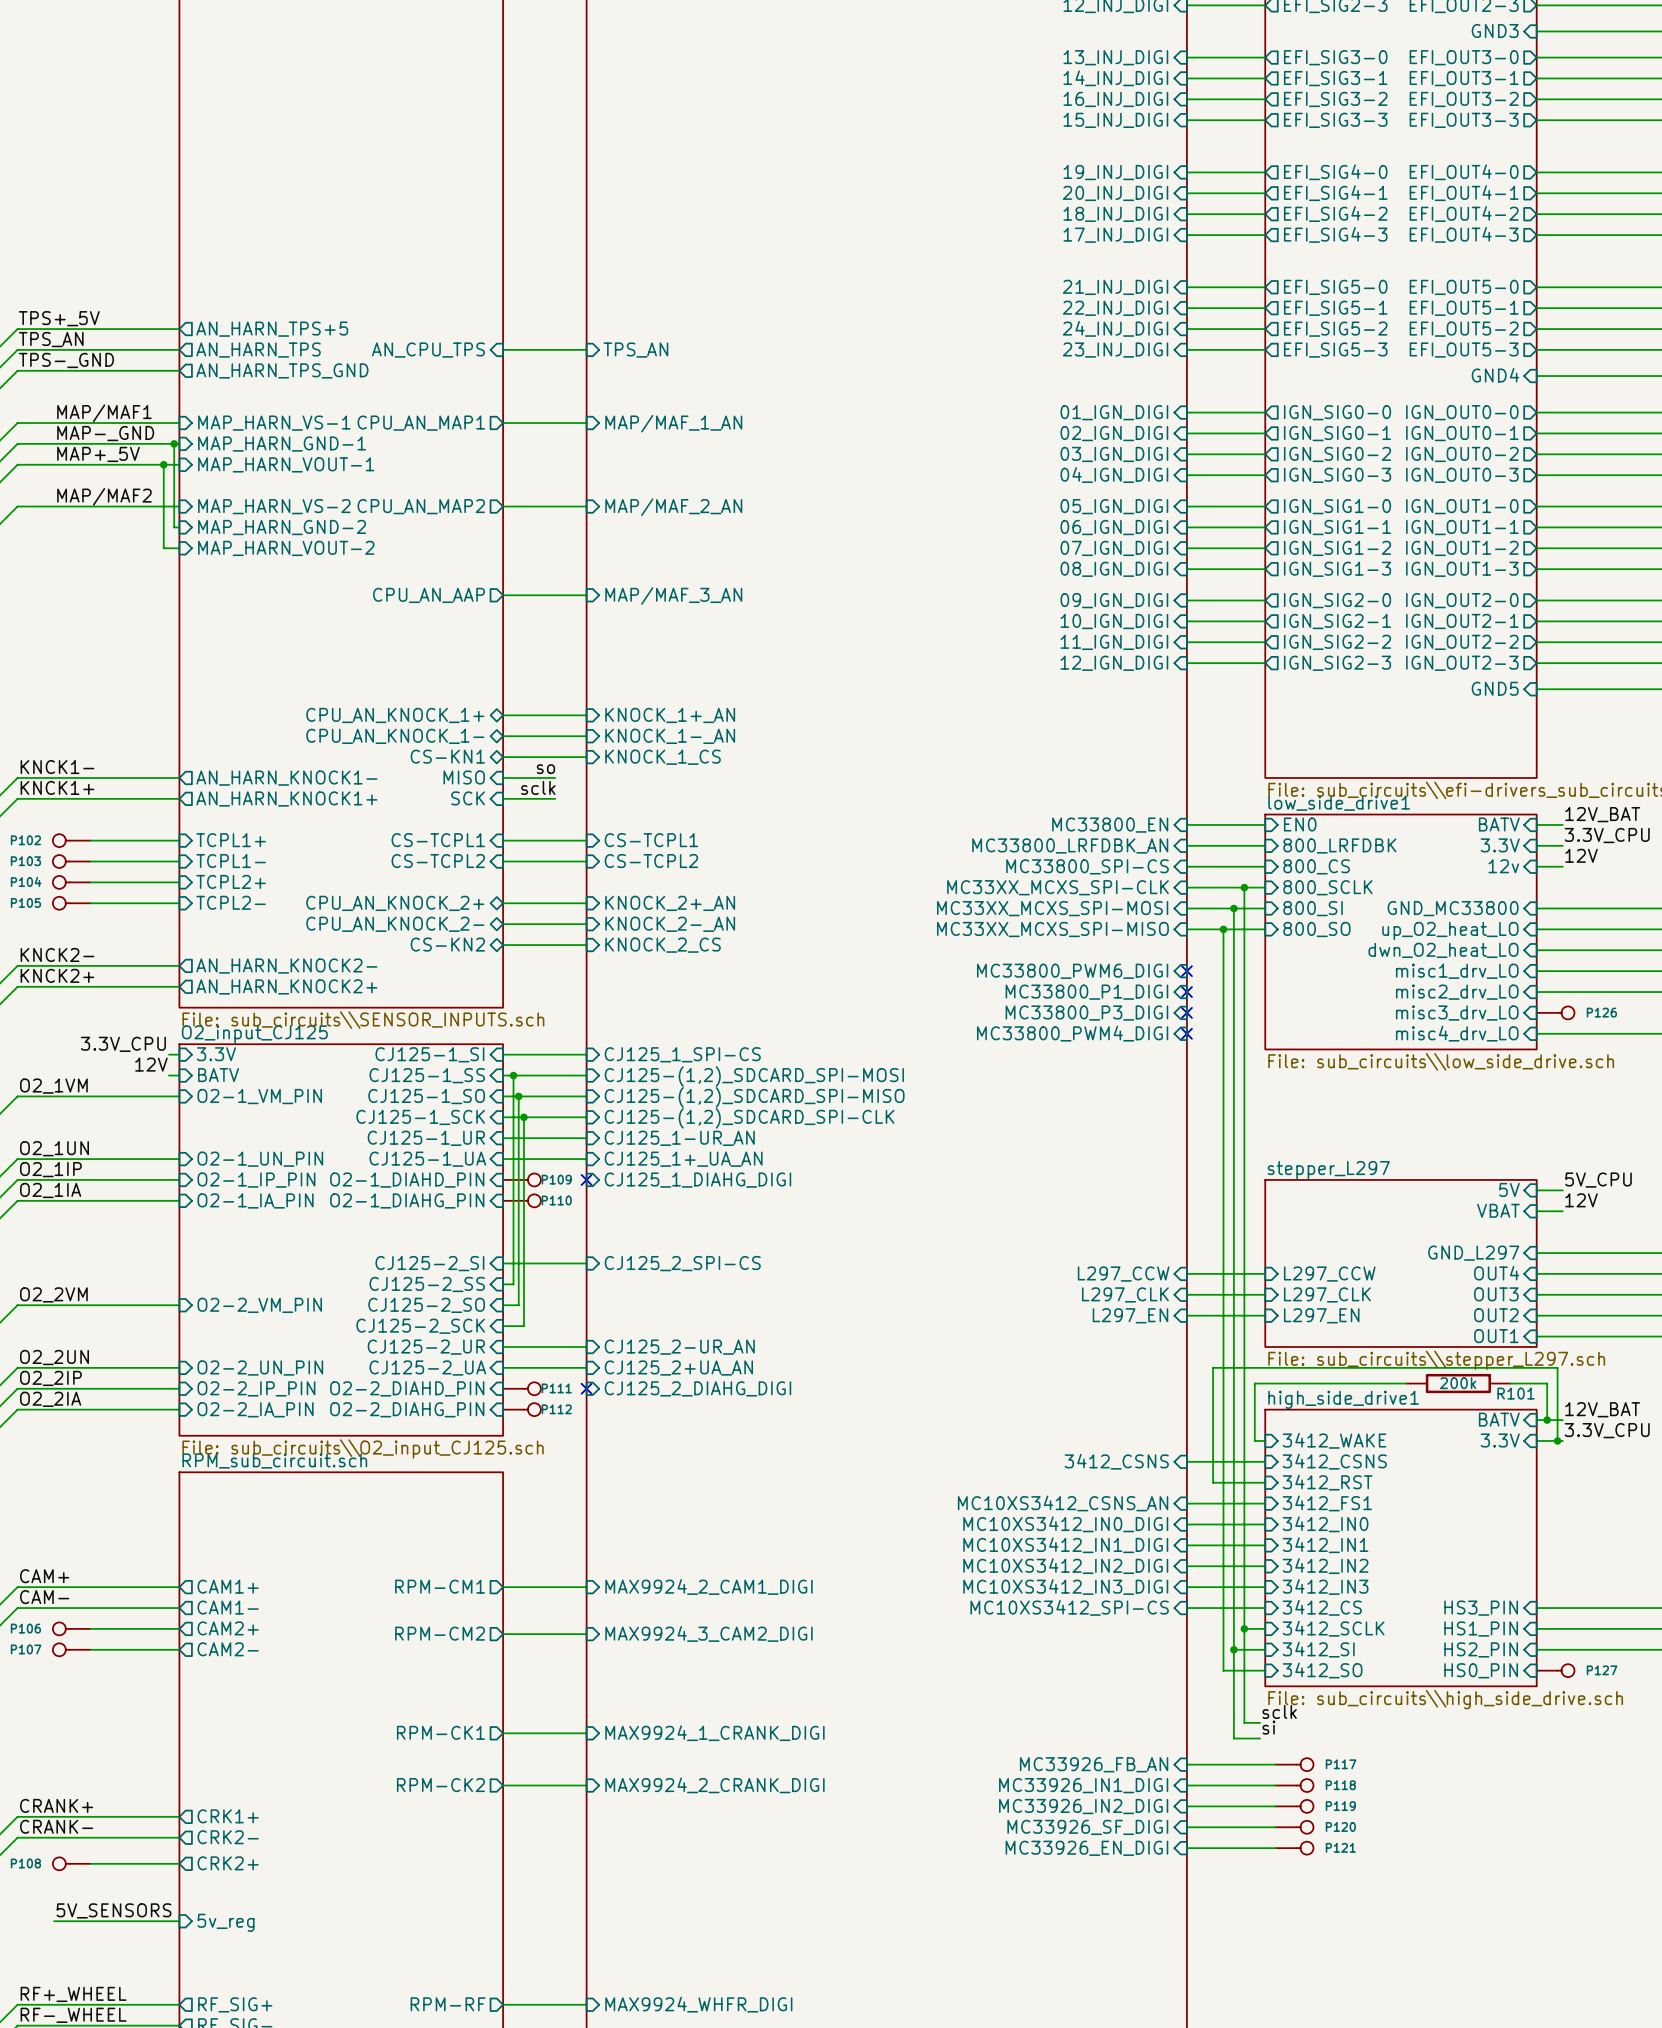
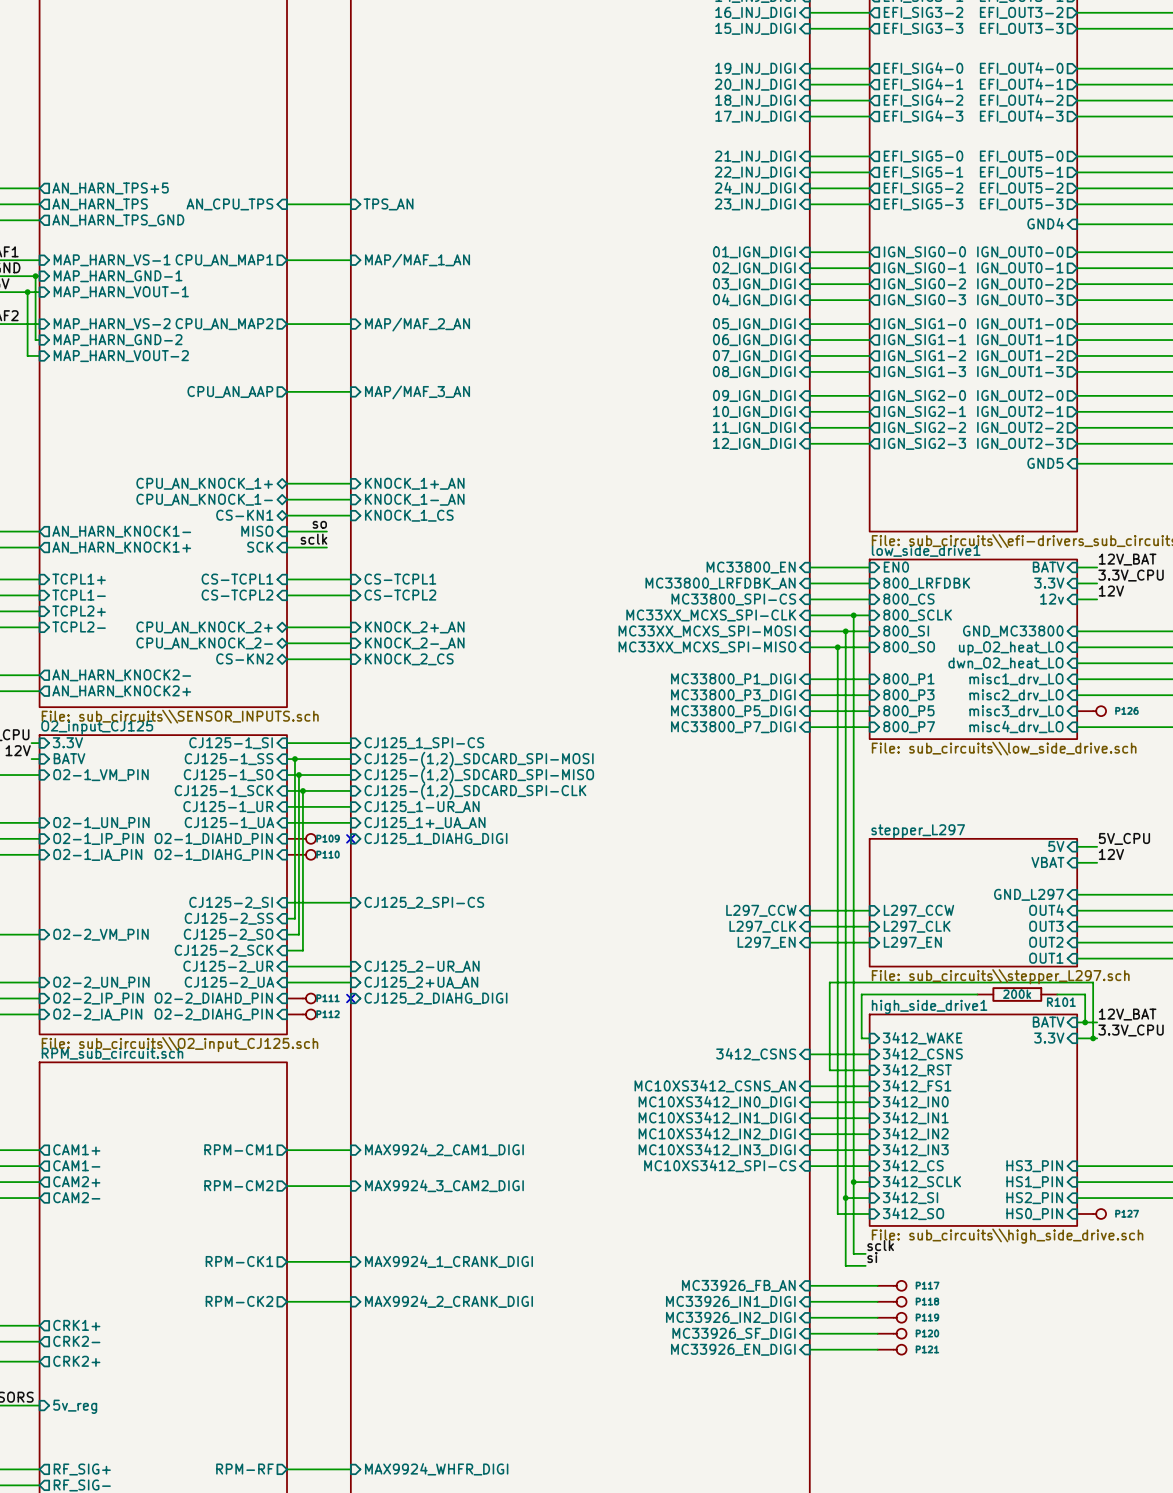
sheet pin: MC33800_PWM6_DIGI (1072, 971) -> MC33800_P1_DIGI (733, 679)
wire: none -> (809, 679) (869, 679)
no-connect mark: (1186, 971) -> none
sheet pin: none -> 800_P1 (908, 679)
sheet pin: MC33800_P1_DIGI (1086, 992) -> MC33800_P3_DIGI (733, 695)
wire: none -> (809, 695) (869, 695)
no-connect mark: (1186, 992) -> none
sheet pin: none -> 800_P3 (908, 695)
wire: none -> (809, 711) (869, 711)
no-connect mark: (1186, 1012) -> none
sheet pin: MC33800_P3_DIGI (1086, 1013) -> MC33800_P5_DIGI (733, 711)
sheet pin: none -> 800_P5 (908, 711)
sheet pin: MC33800_PWM4_DIGI (1072, 1033) -> MC33800_P7_DIGI (733, 727)
wire: none -> (809, 727) (869, 727)
no-connect mark: (1186, 1033) -> none
sheet pin: none -> 800_P7 (909, 727)

